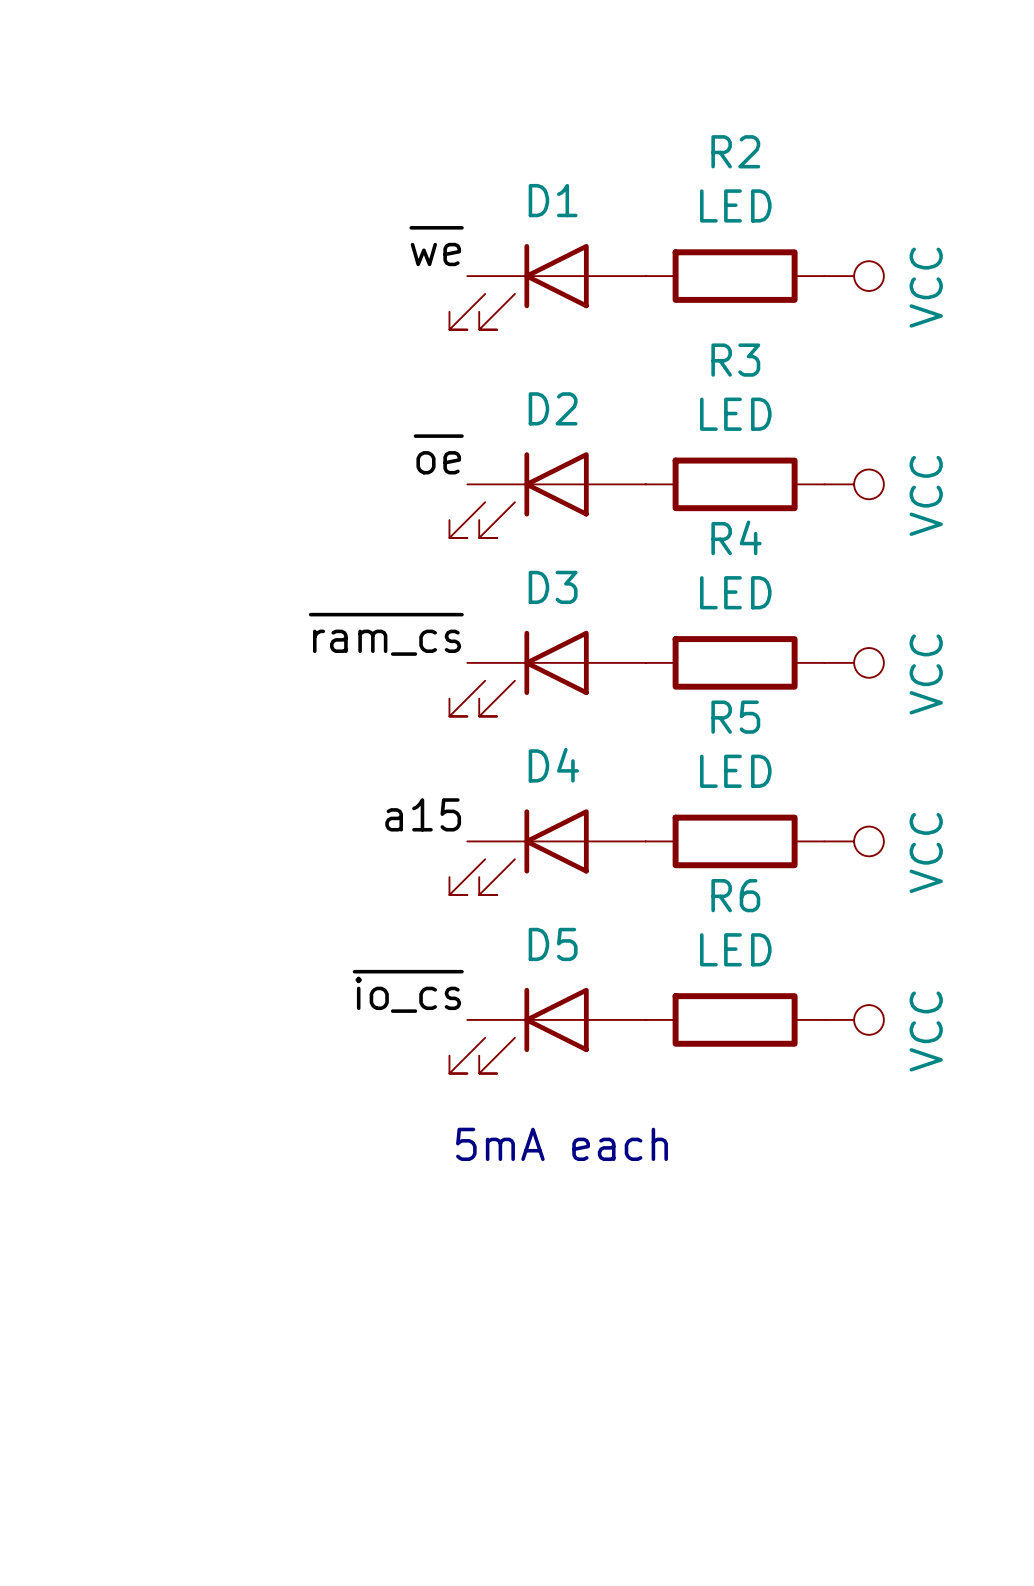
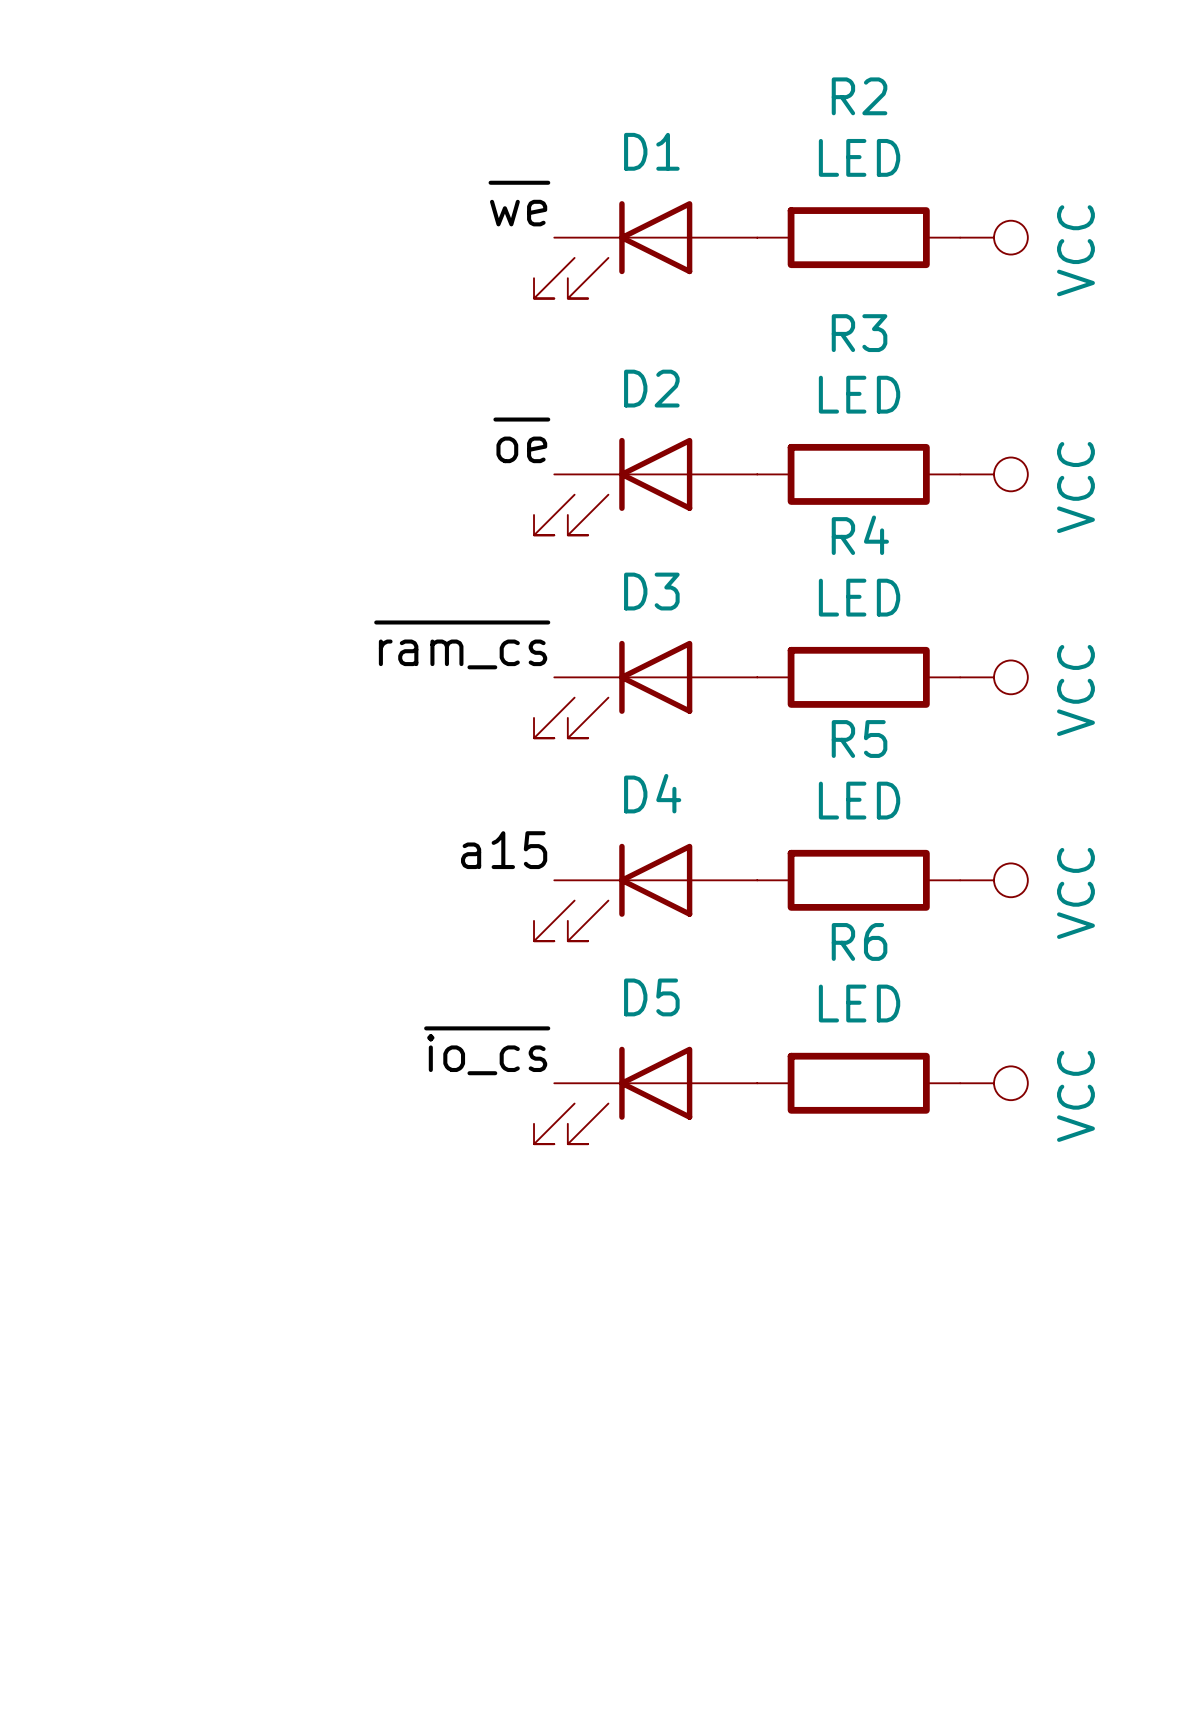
text: 5mA each (562, 1144) -> none

